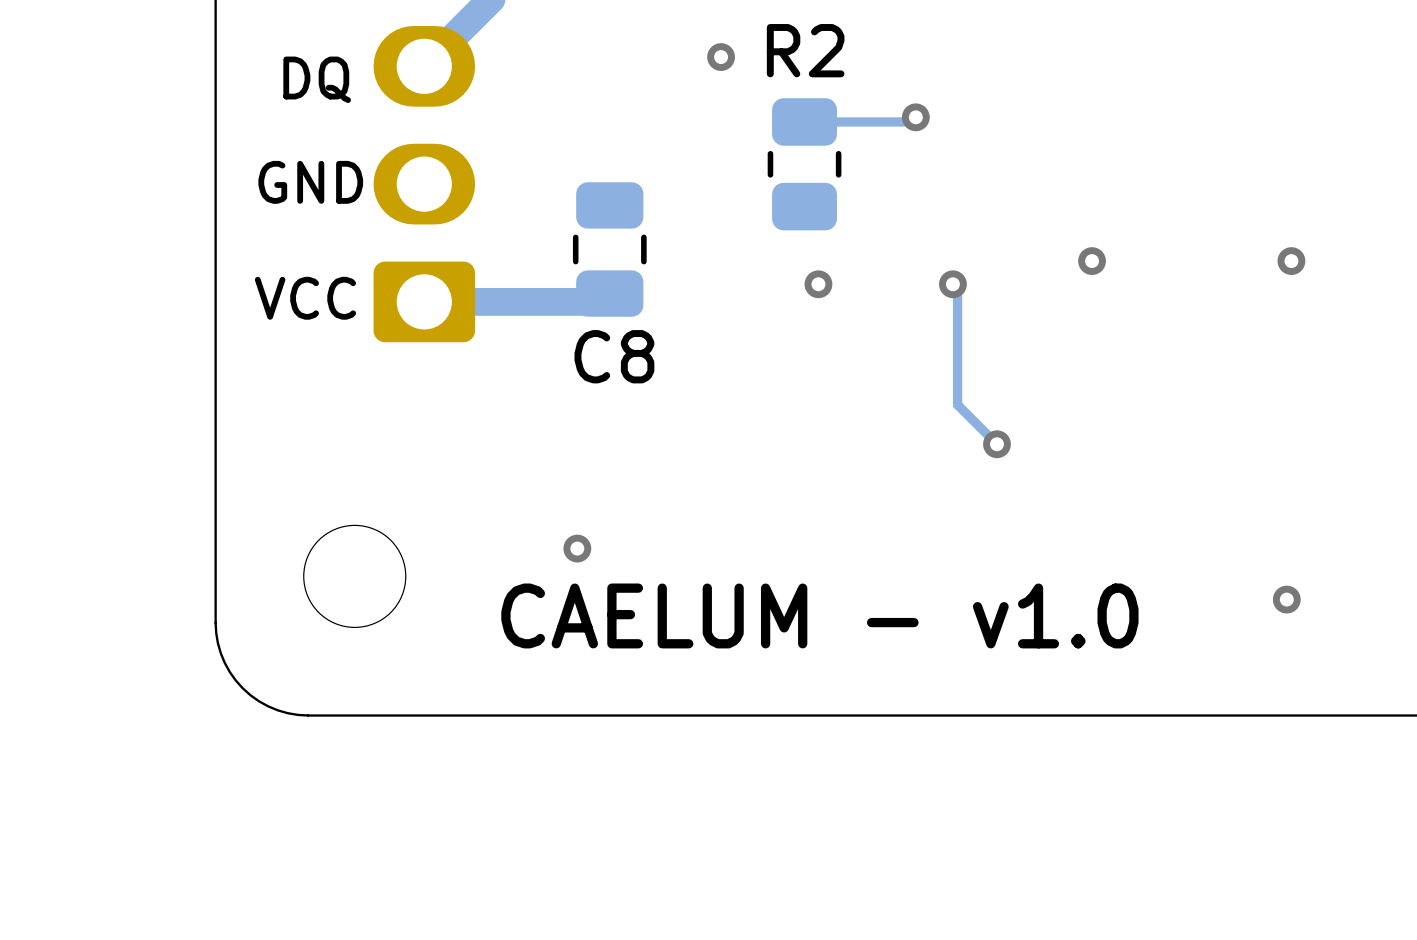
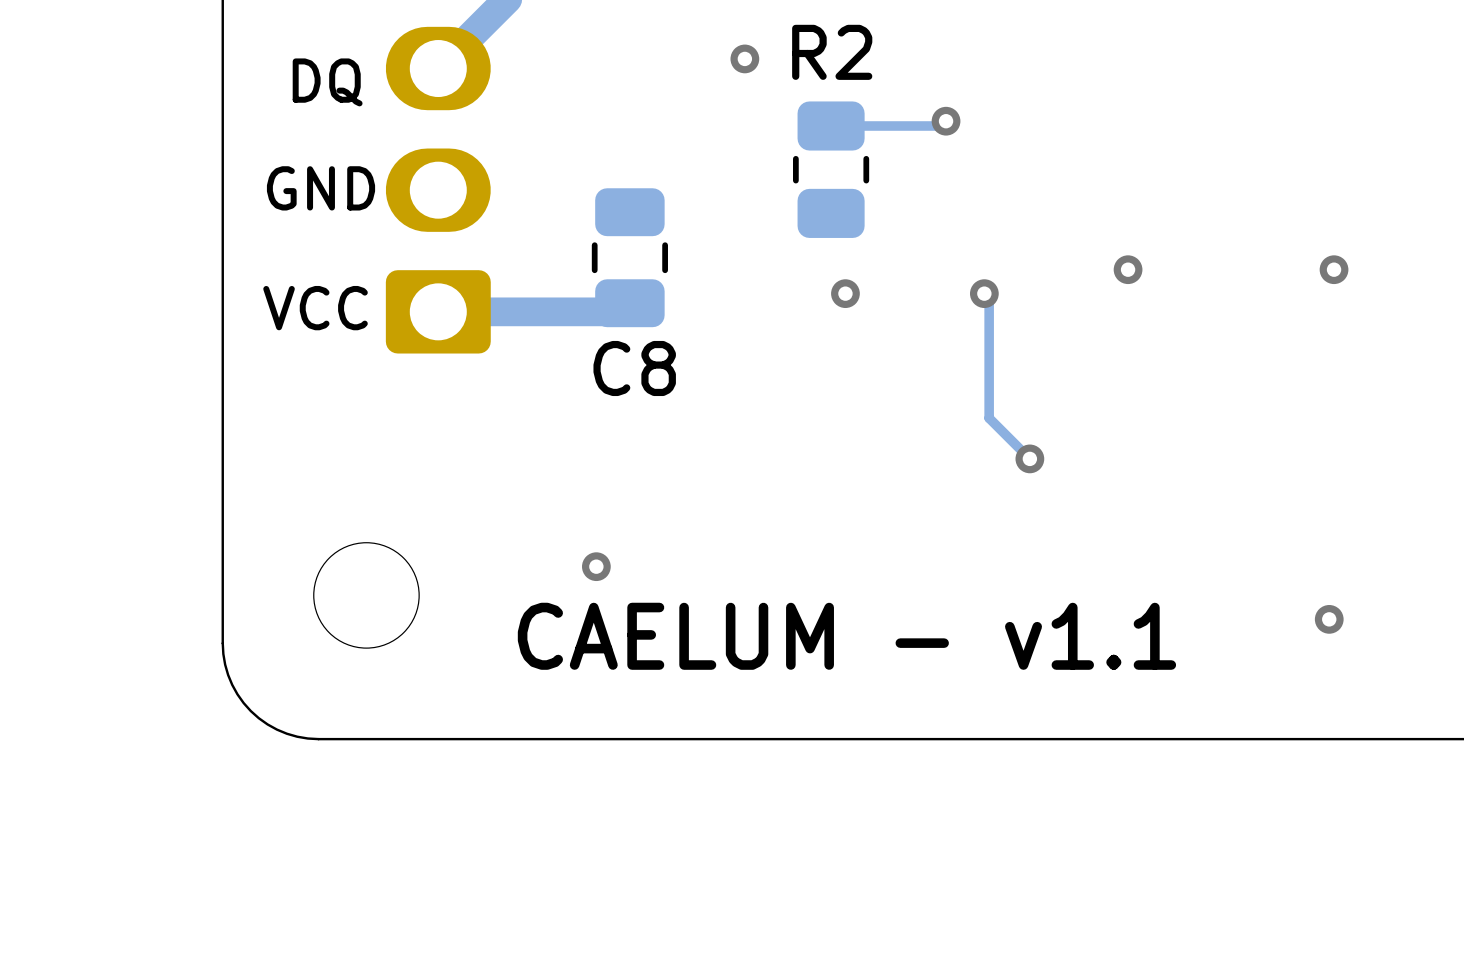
text: CAELUM - v1.0 (819, 615) -> CAELUM - v1.1 (846, 636)

